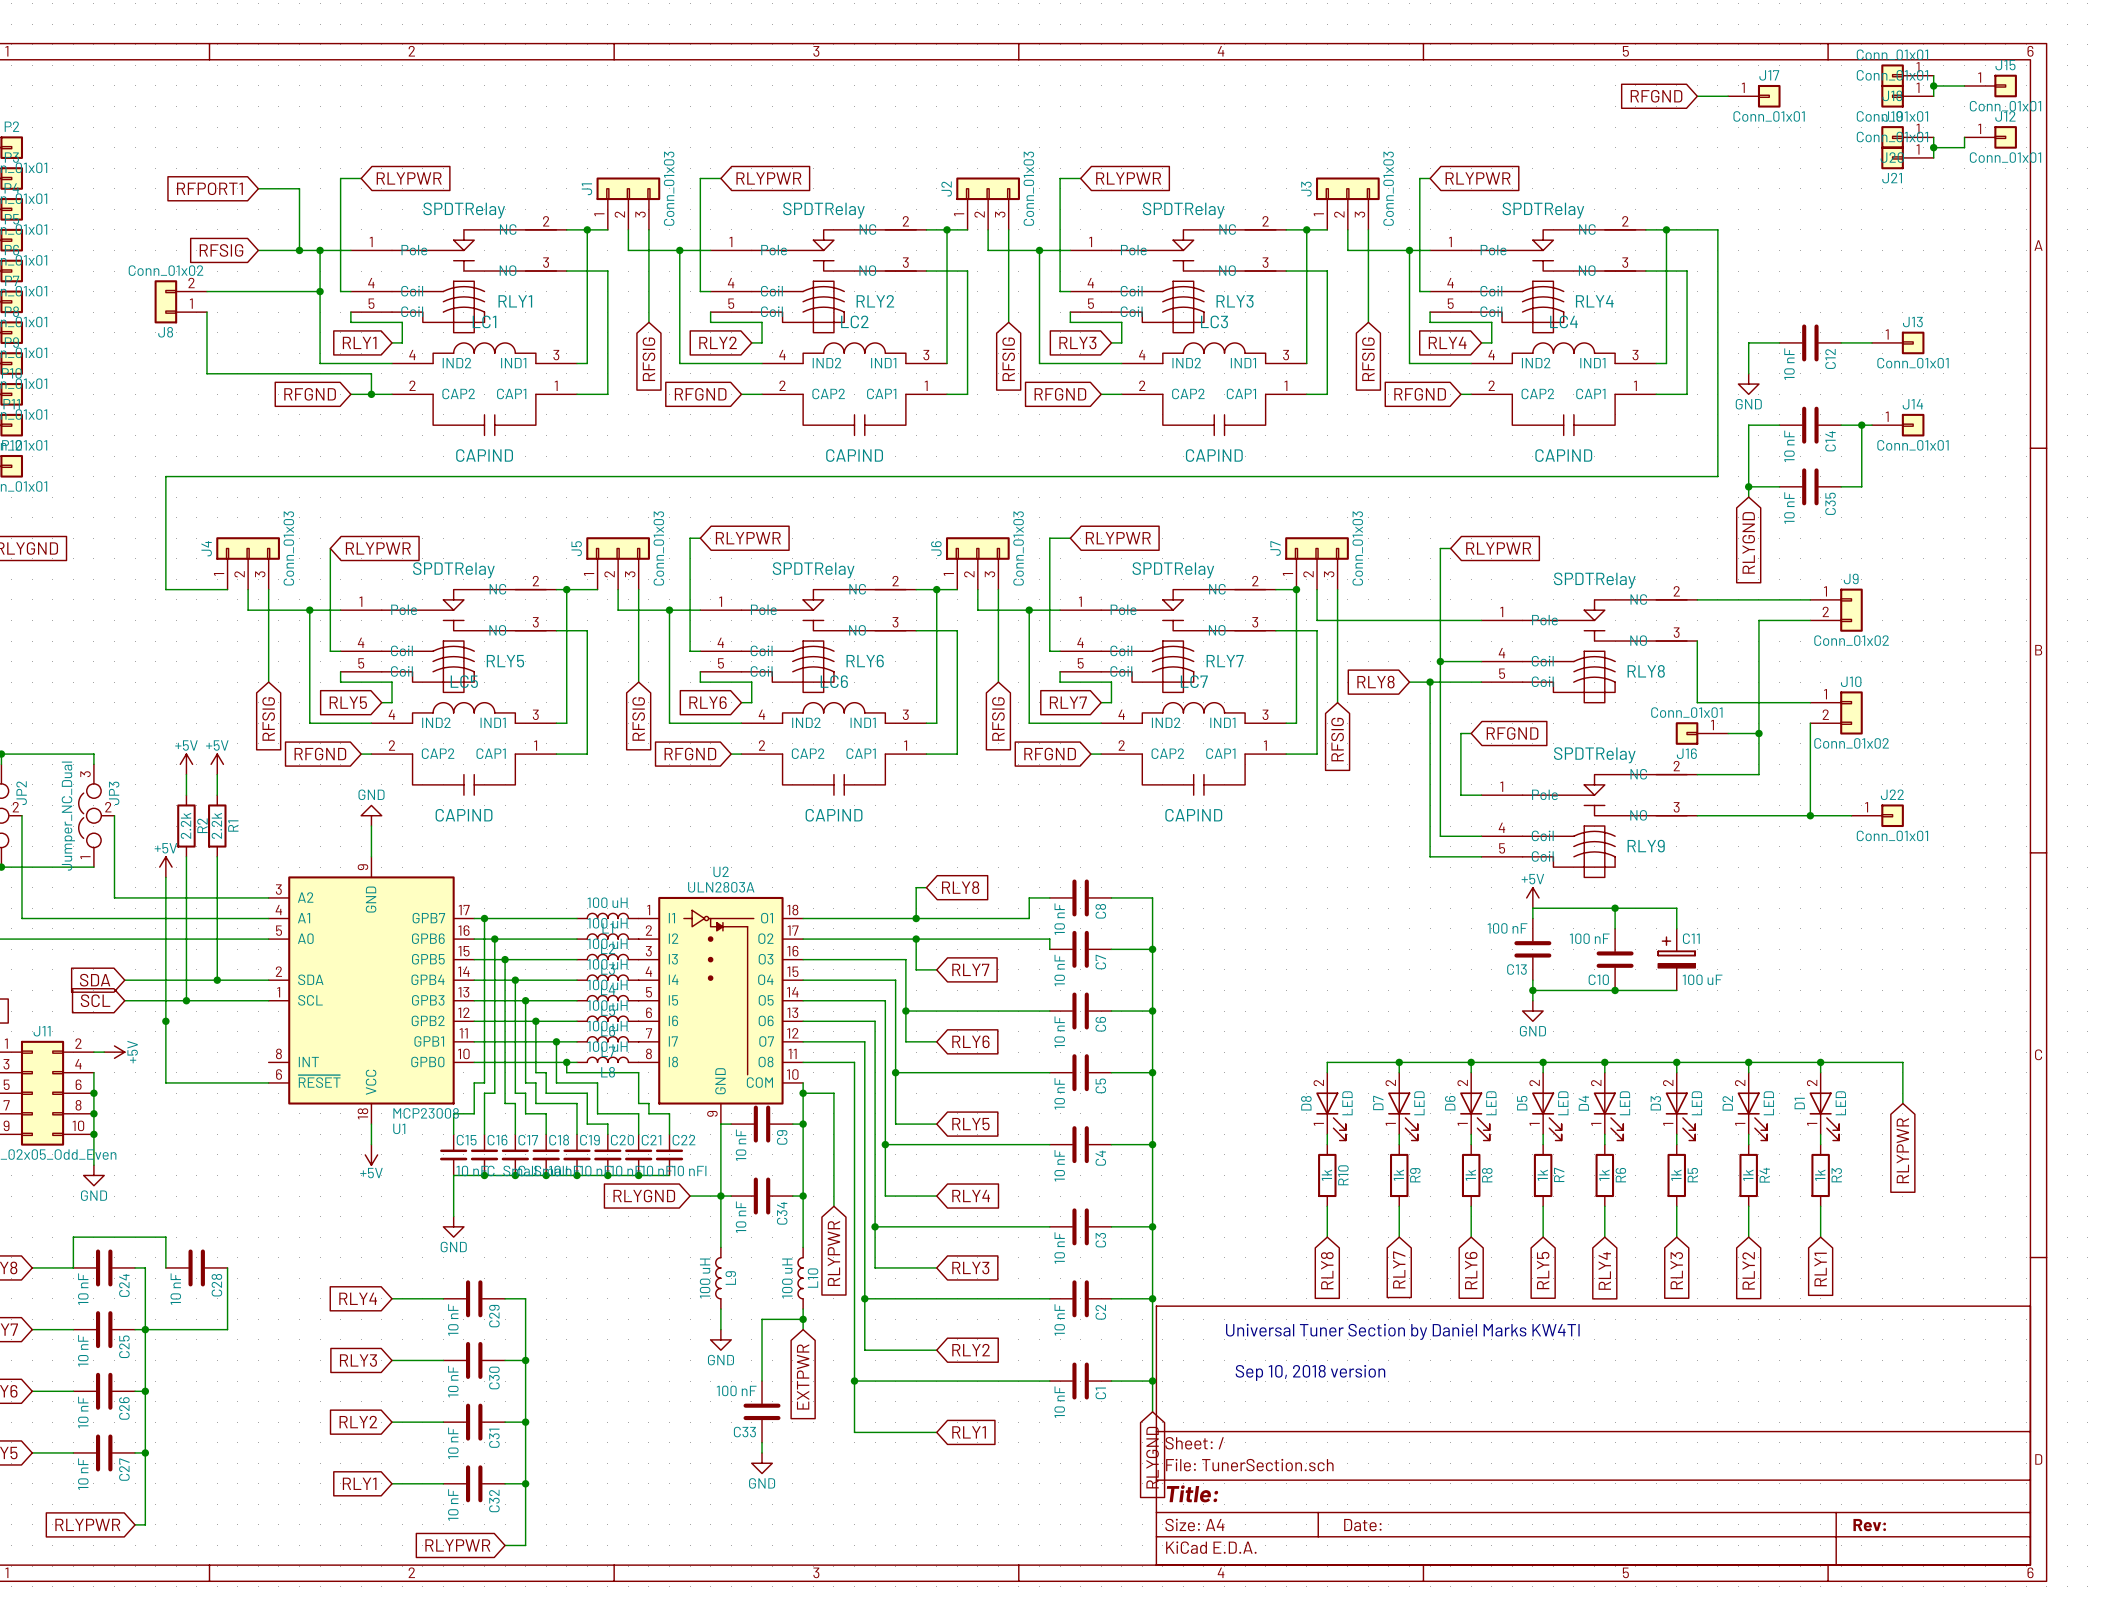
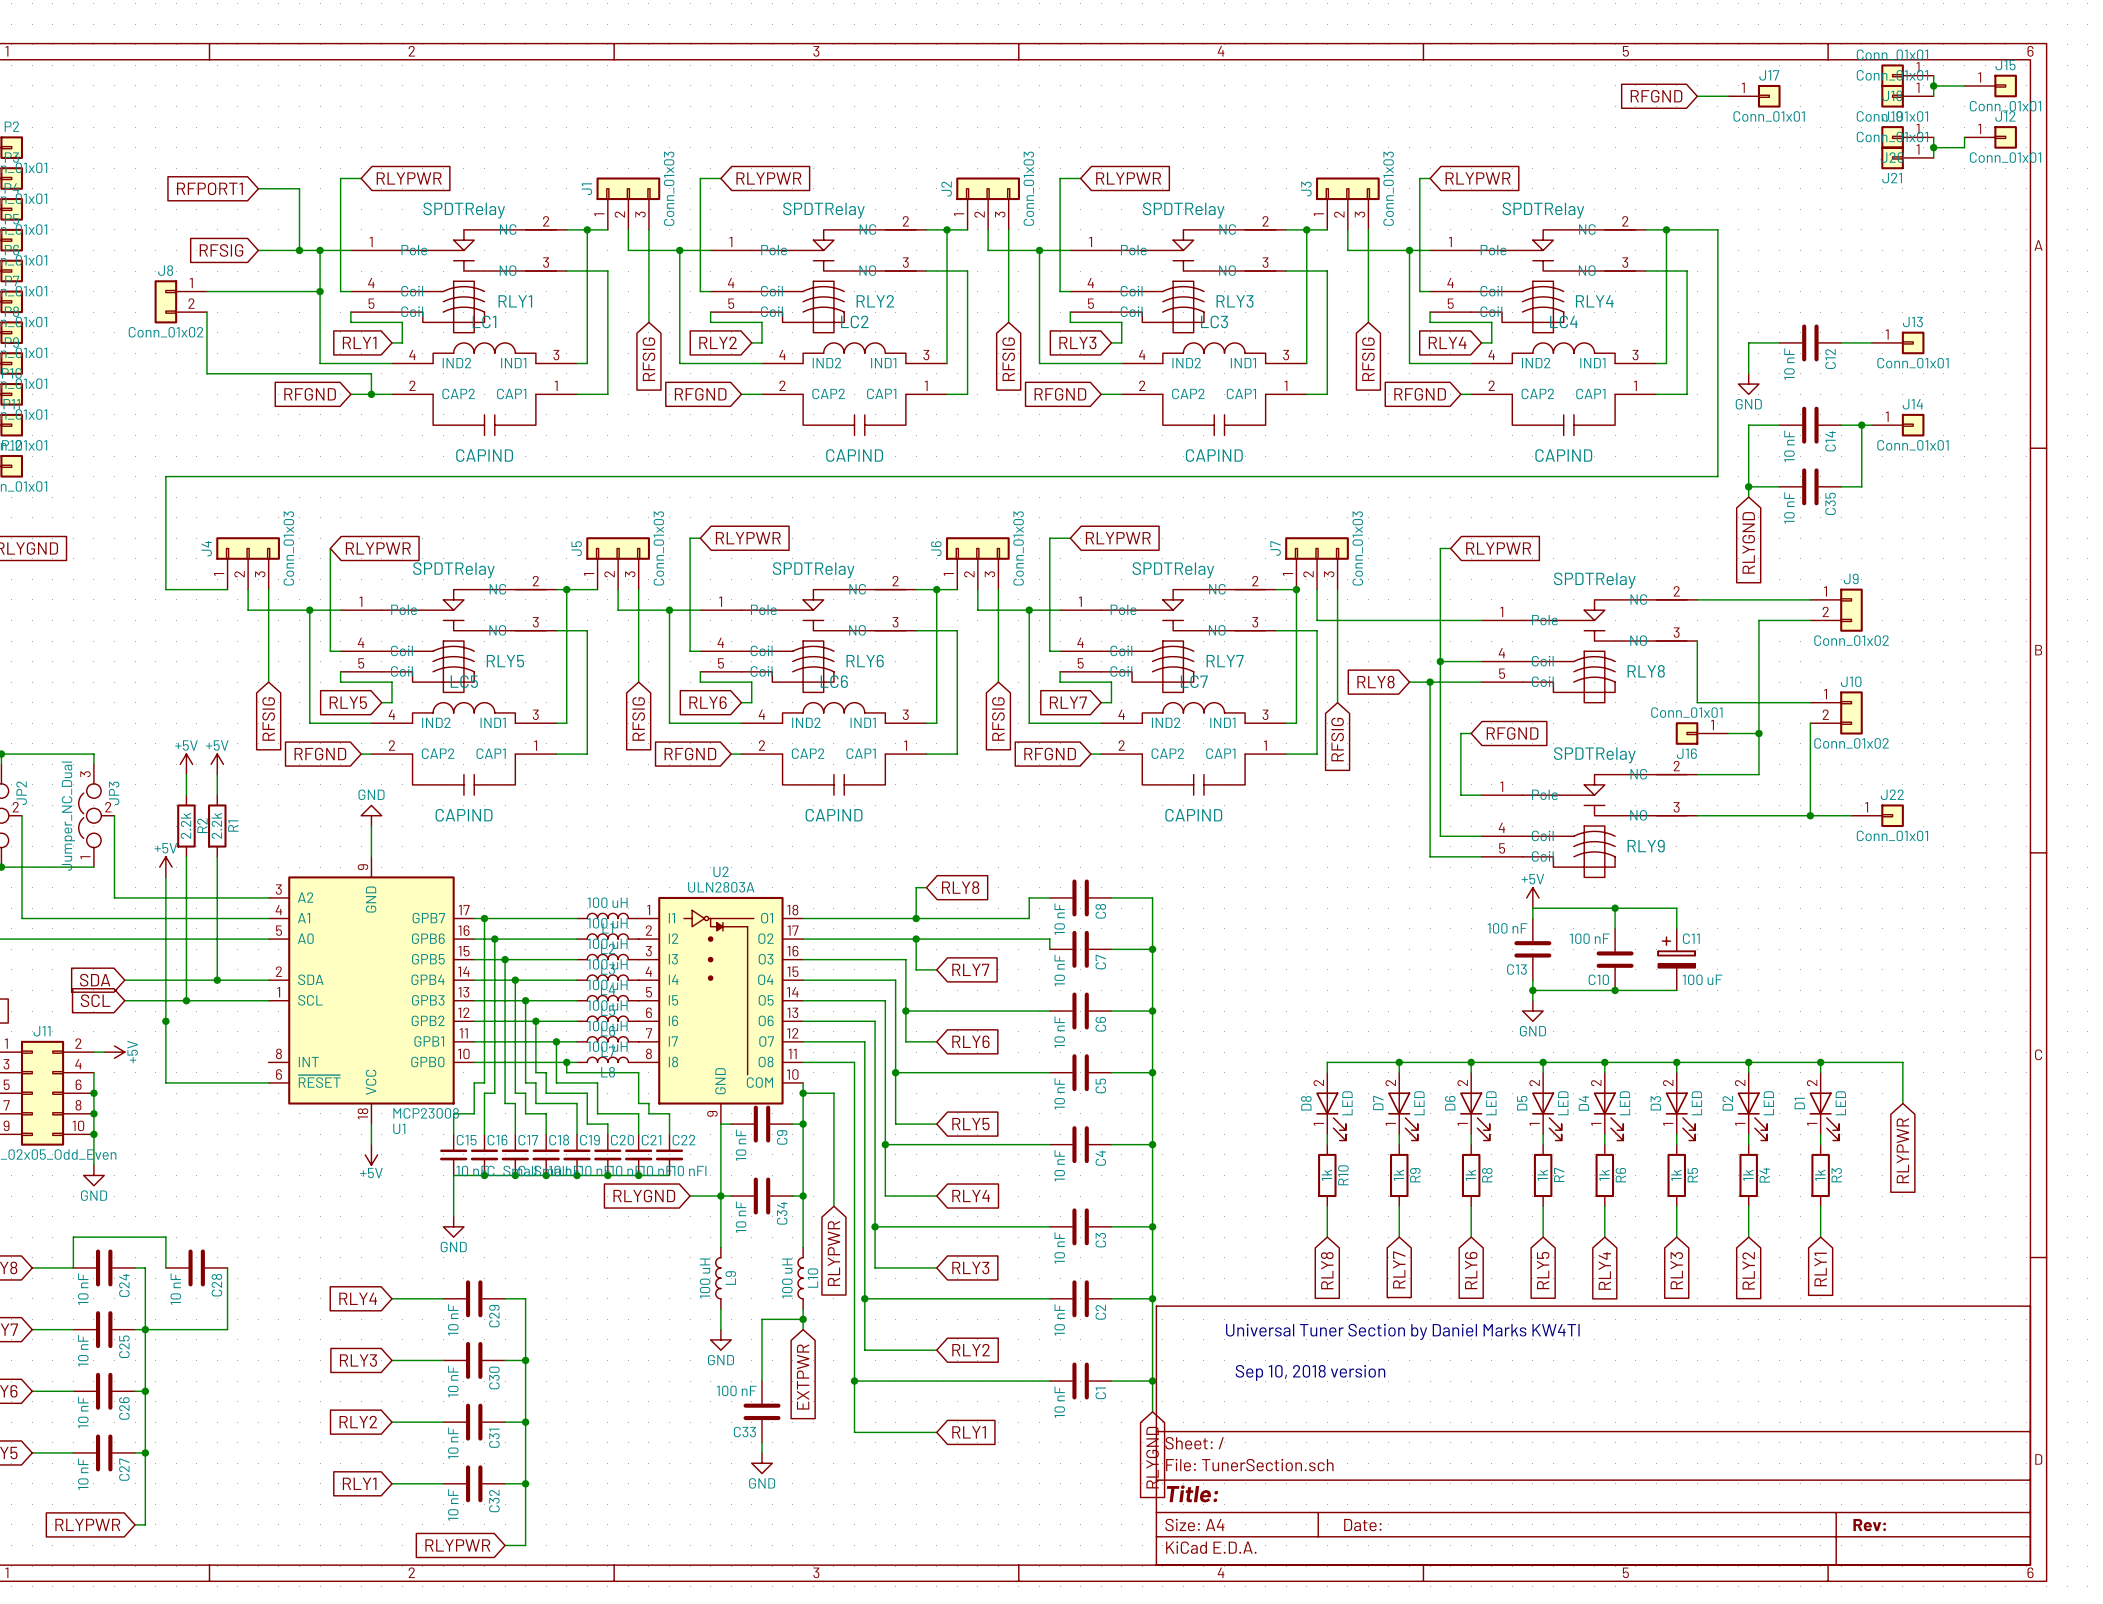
J8 flip: as is (165, 301) -> up-down (165, 301)

